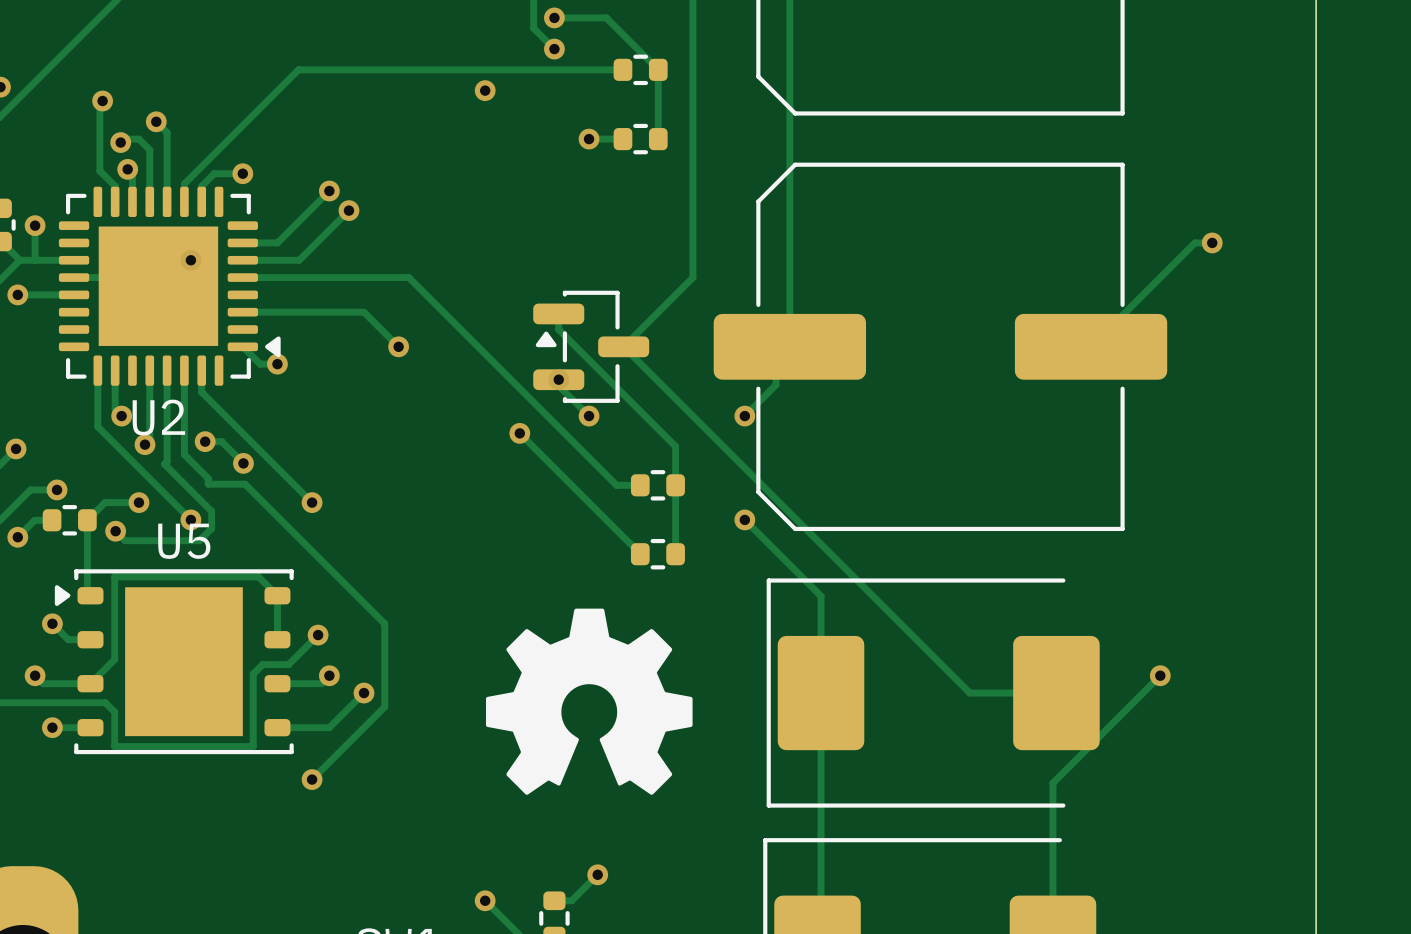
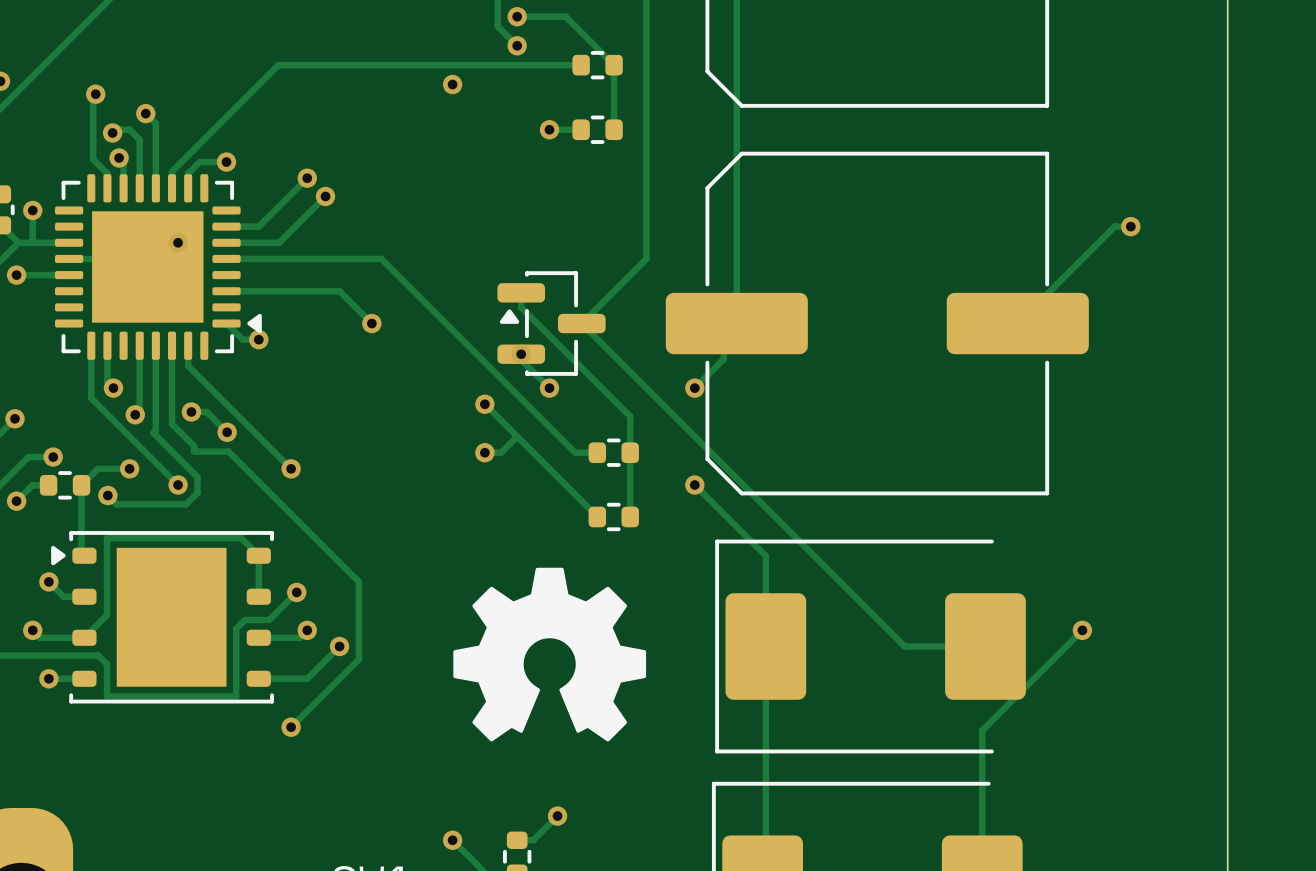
U2 name: U2 (158, 417) -> none
track: none -> (516, 437) (501, 452) (484, 452)
via: none -> (484, 452)
U5 name: U5 (184, 541) -> none

